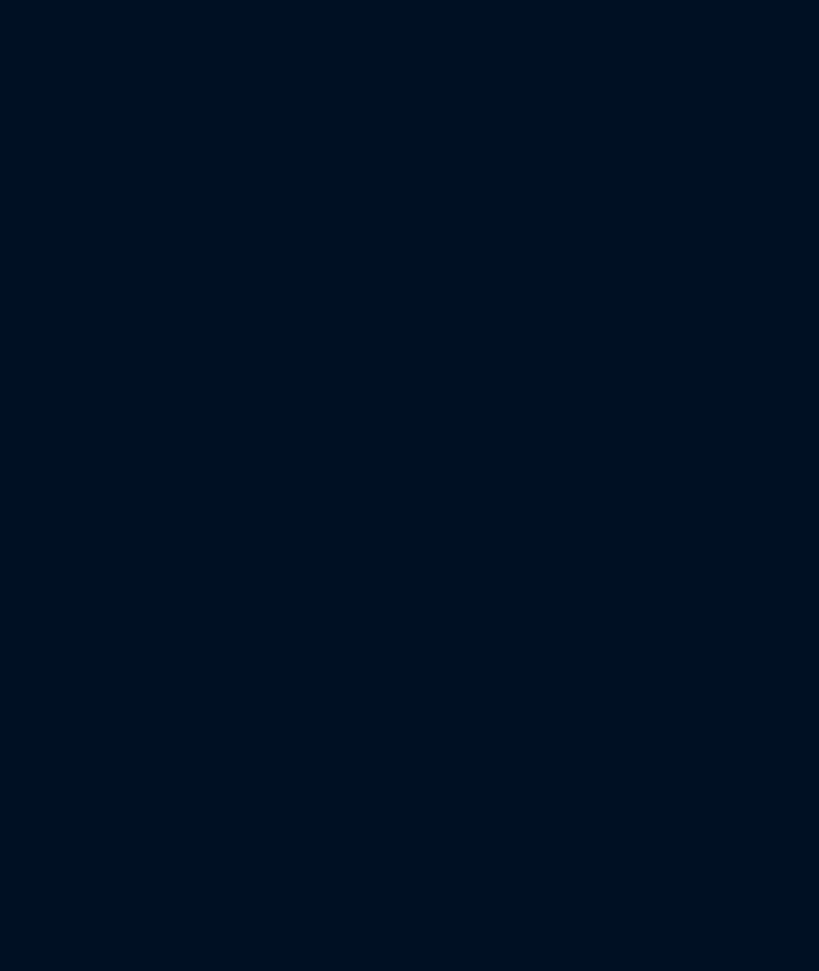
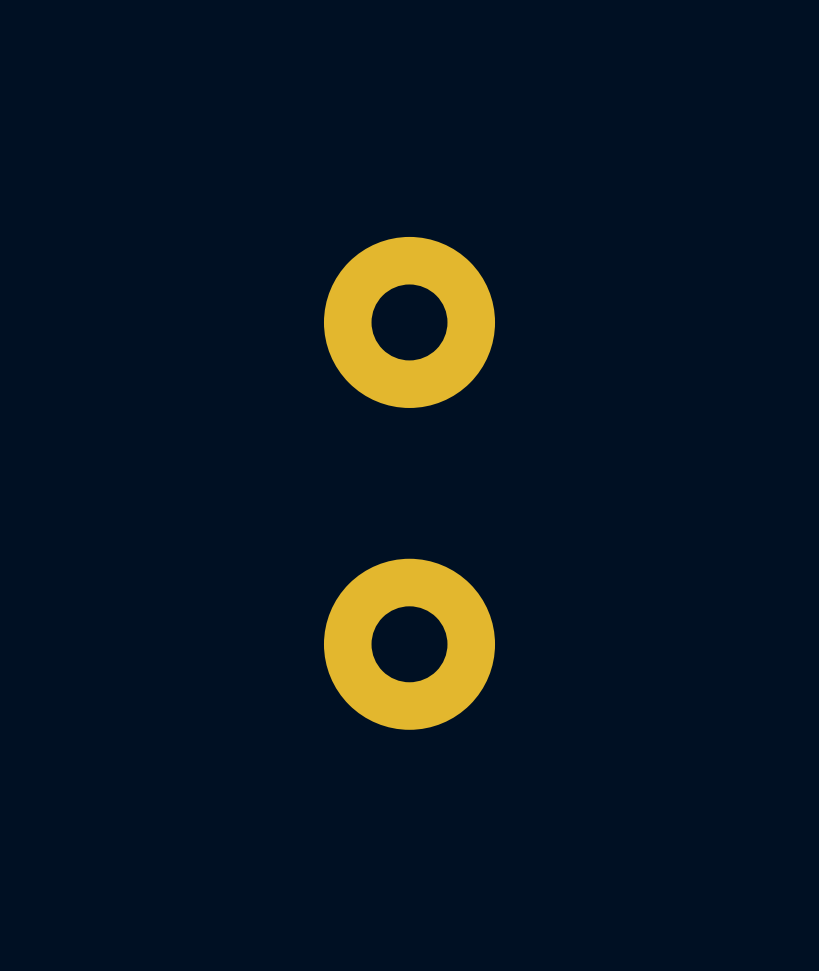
part: none -> (409, 483)

